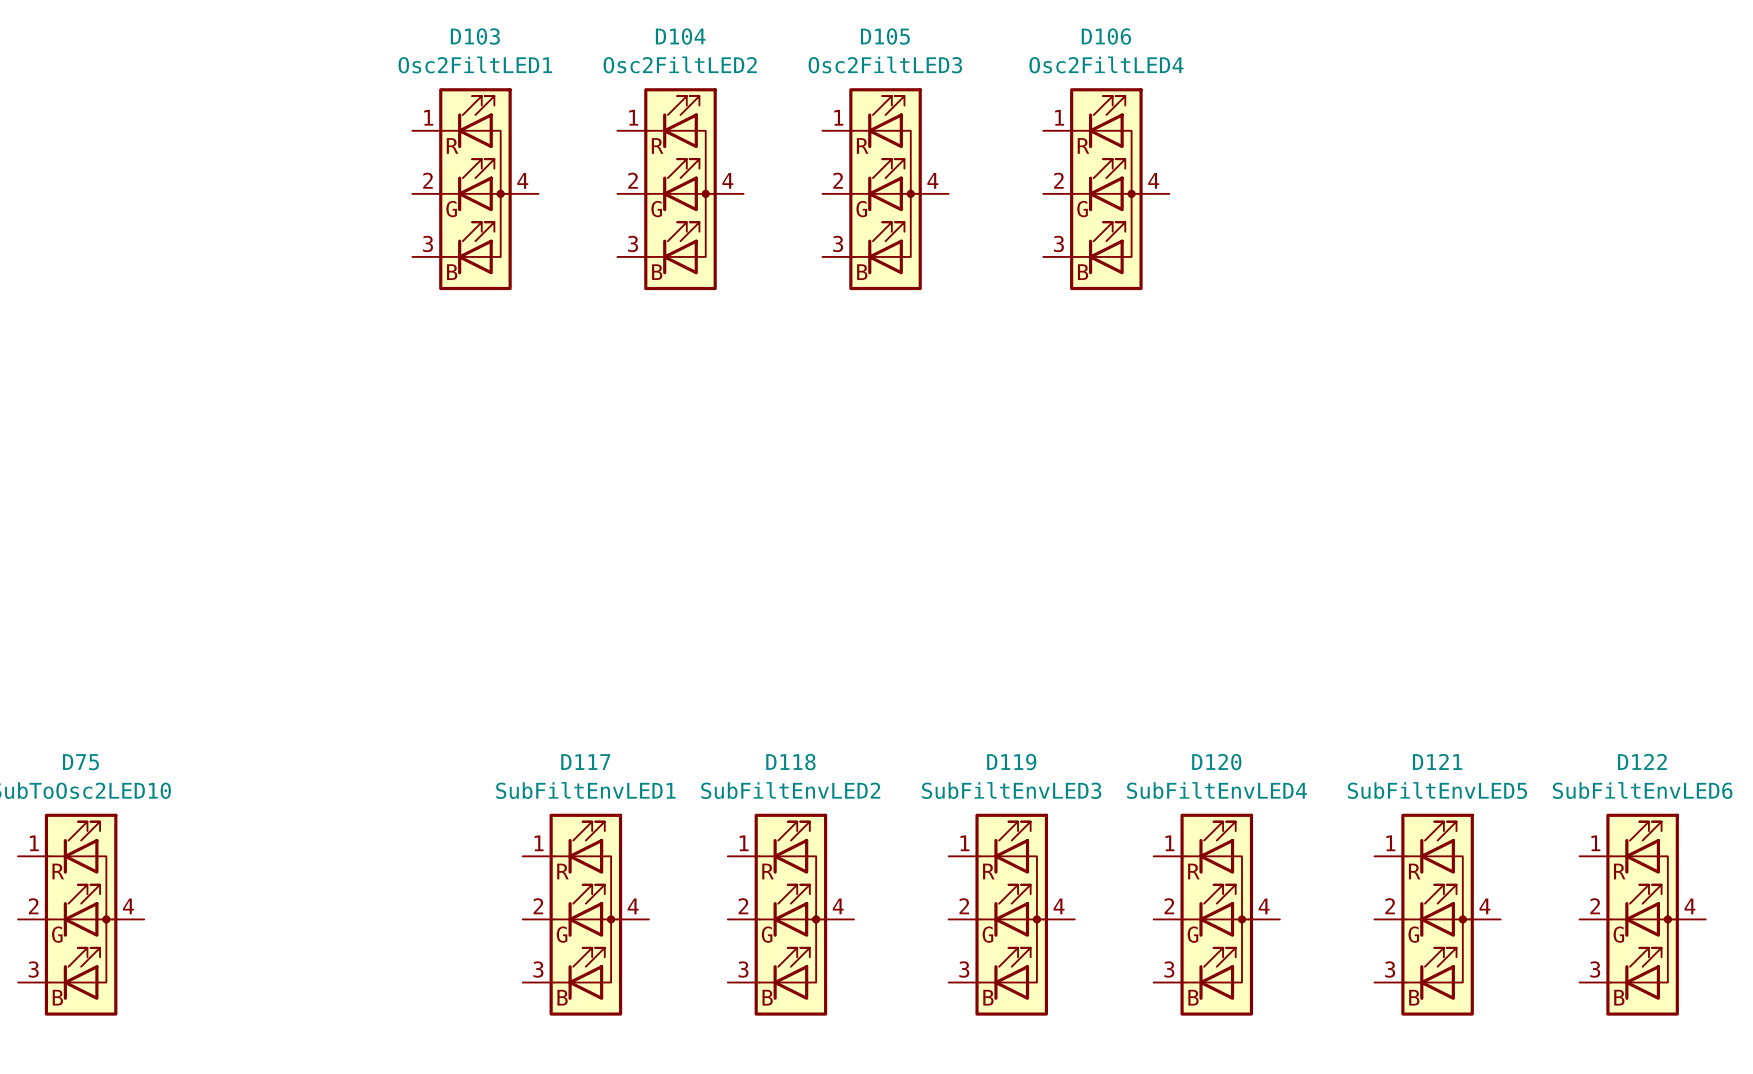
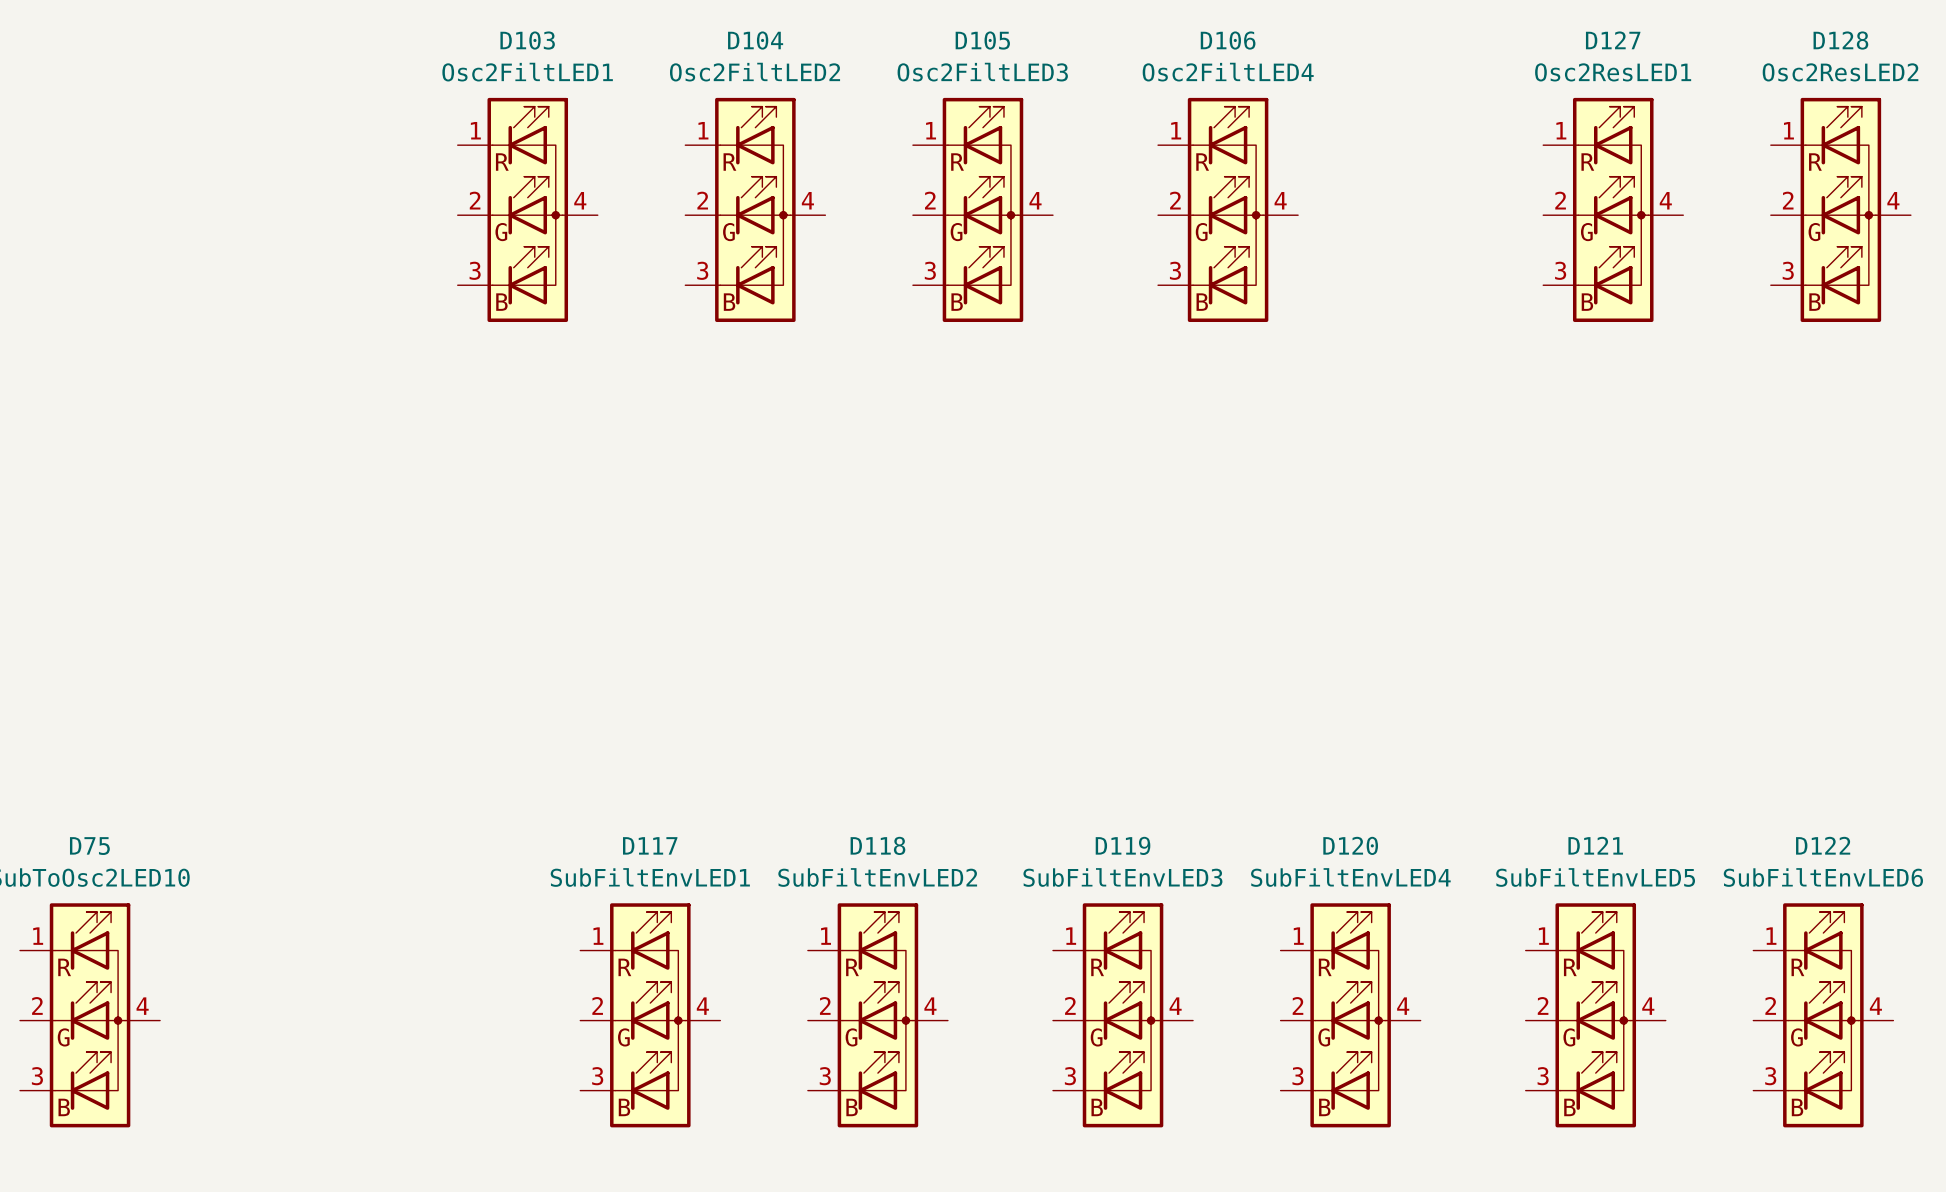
D127: none -> Osc2ResLED1 (1613, 209)
D128: none -> Osc2ResLED2 (1840, 209)

